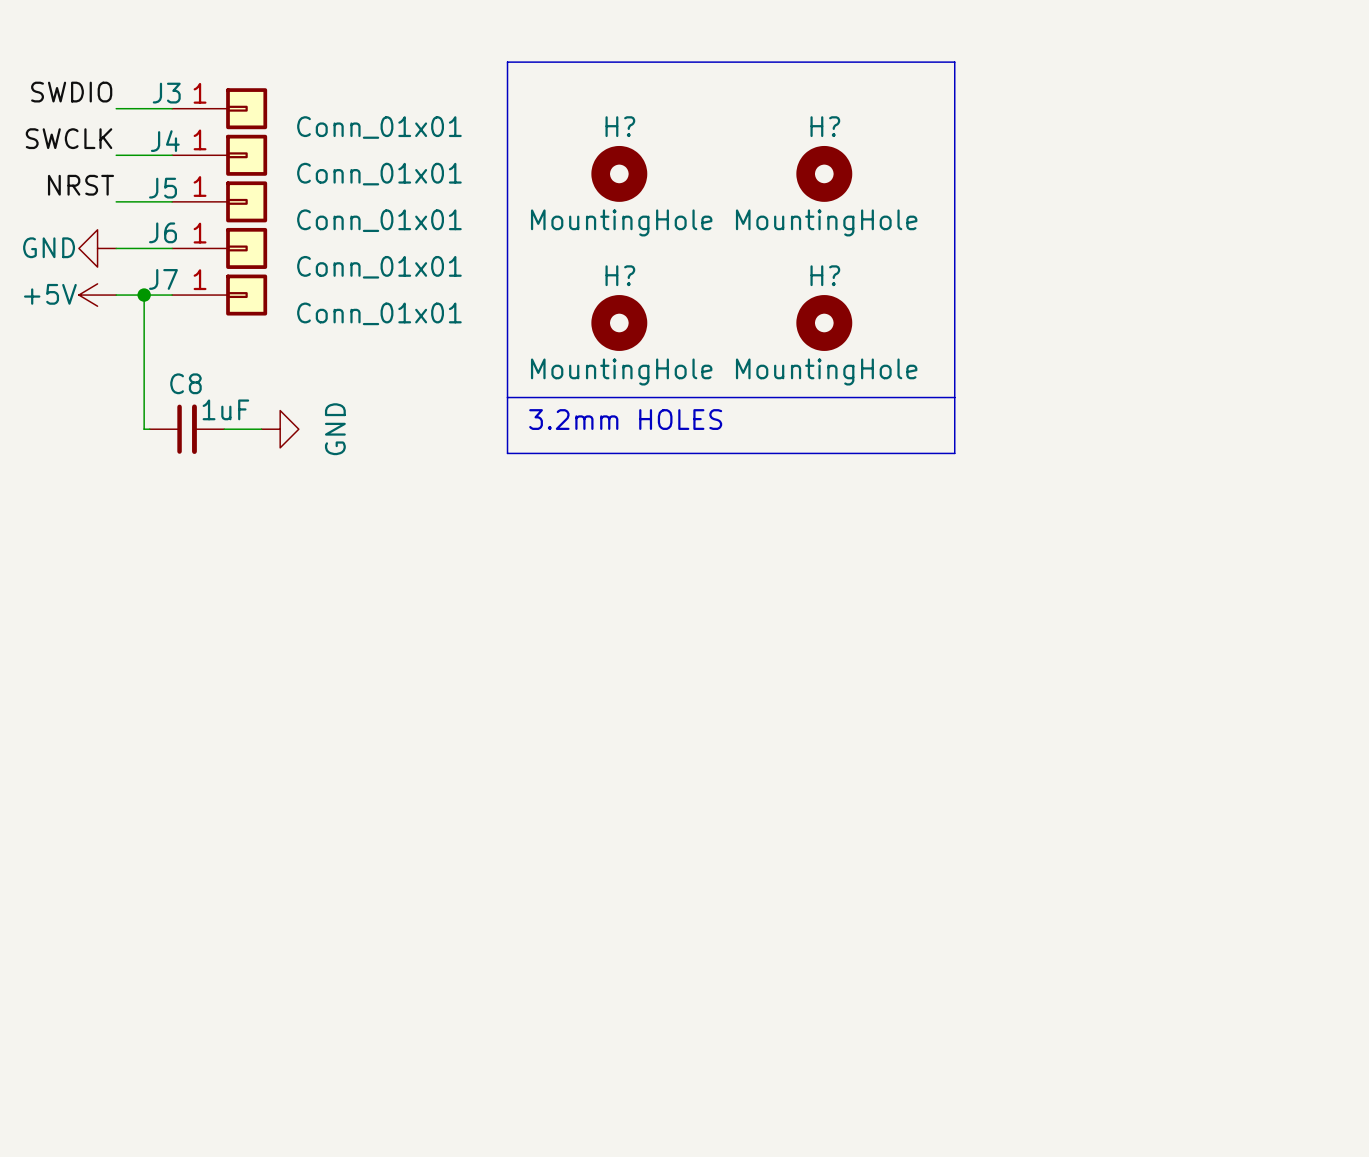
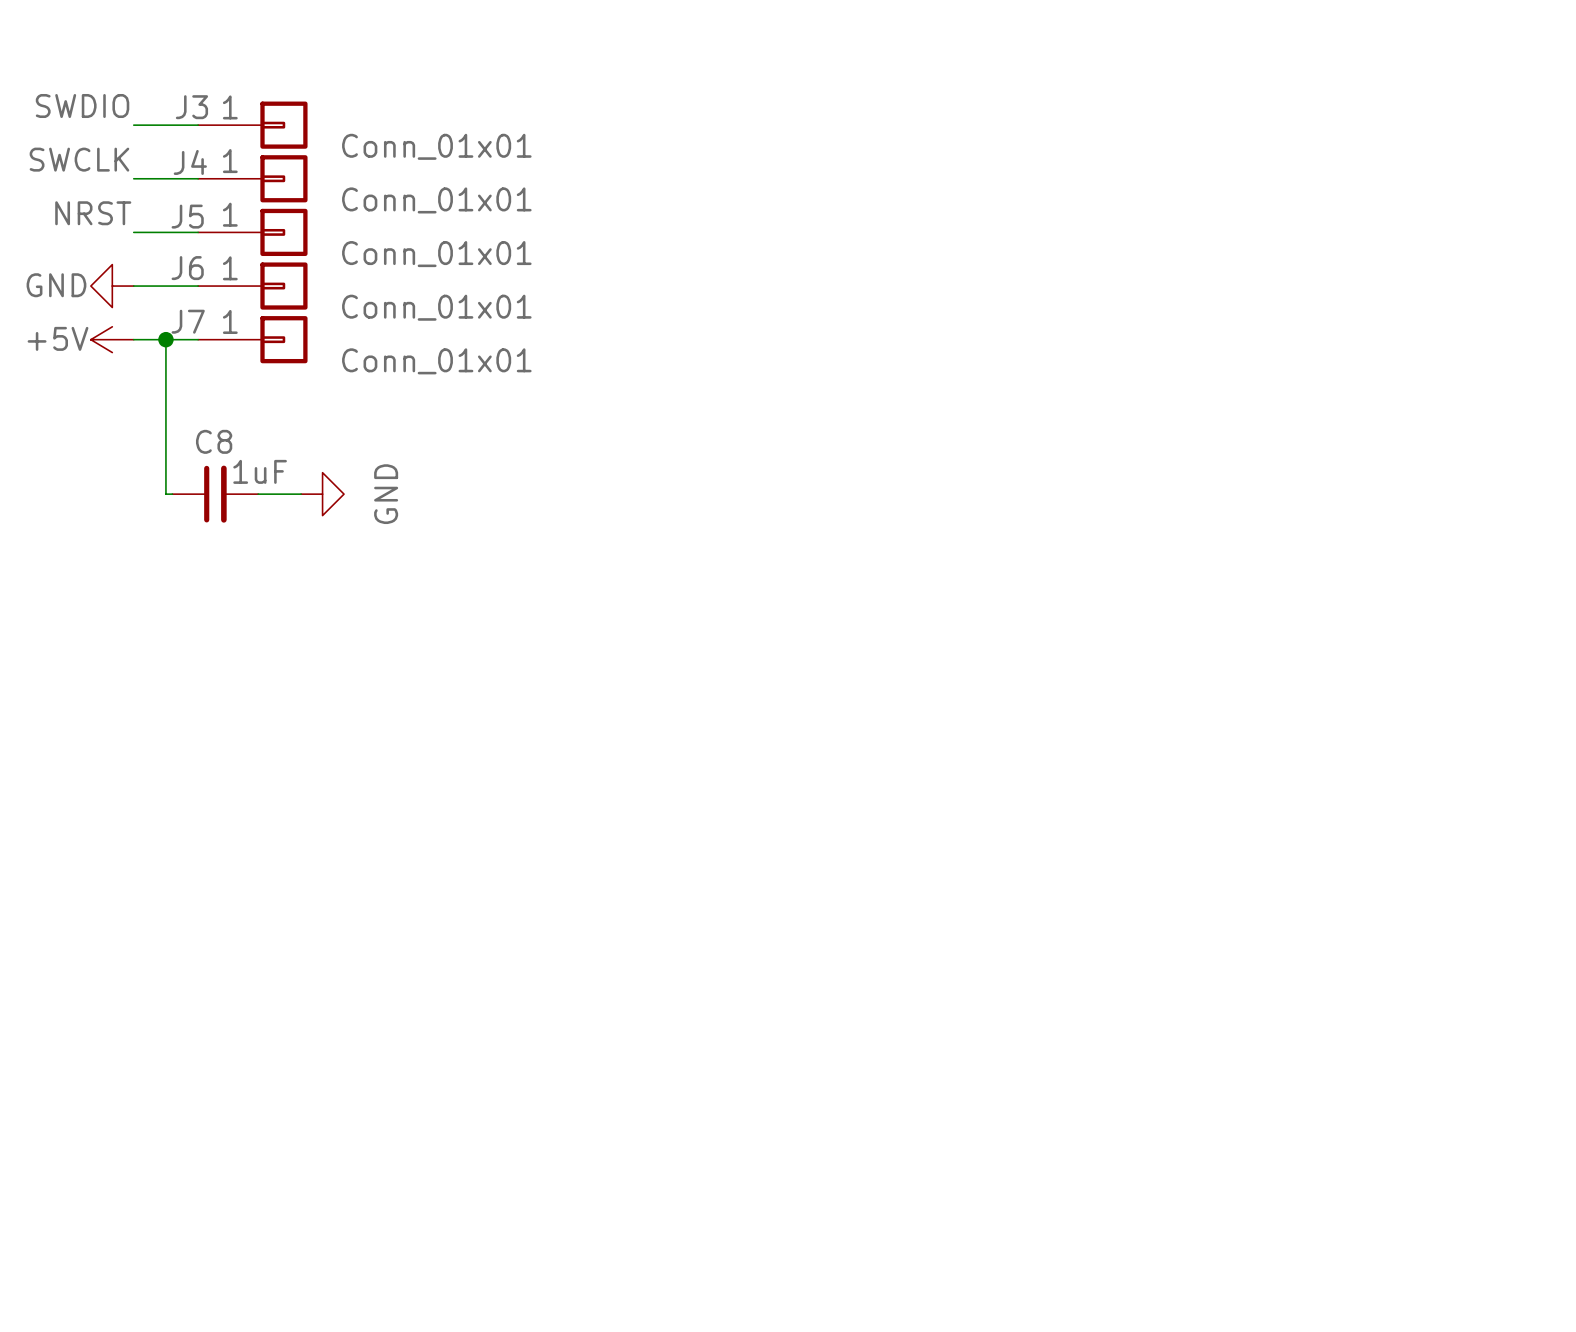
line: (507, 62) (507, 453) (954, 453) (954, 62) (507, 62) -> none
H?: MountingHole (619, 173) -> none
H?: MountingHole (824, 173) -> none
H?: MountingHole (619, 322) -> none
H?: MountingHole (824, 322) -> none
line: (507, 397) (954, 397) -> none
text: 3.2mm HOLES (625, 419) -> none

